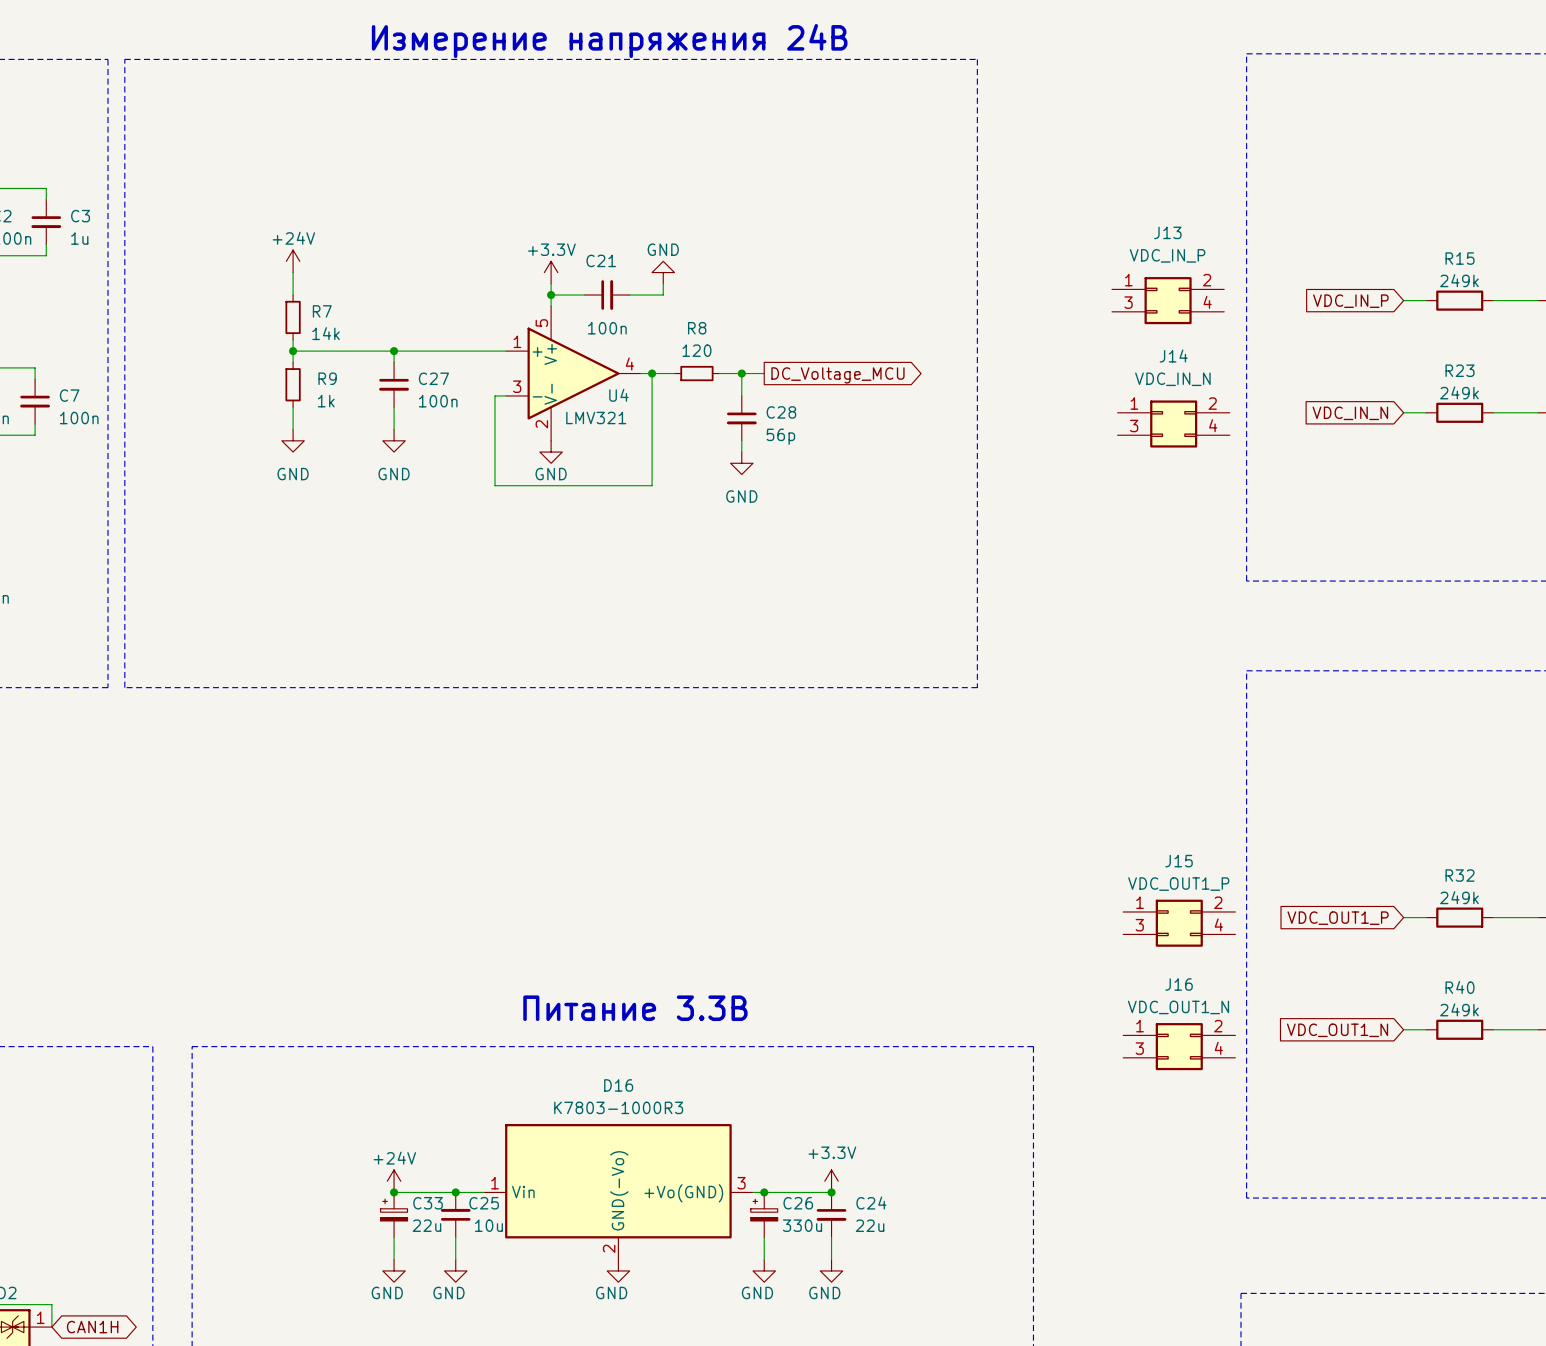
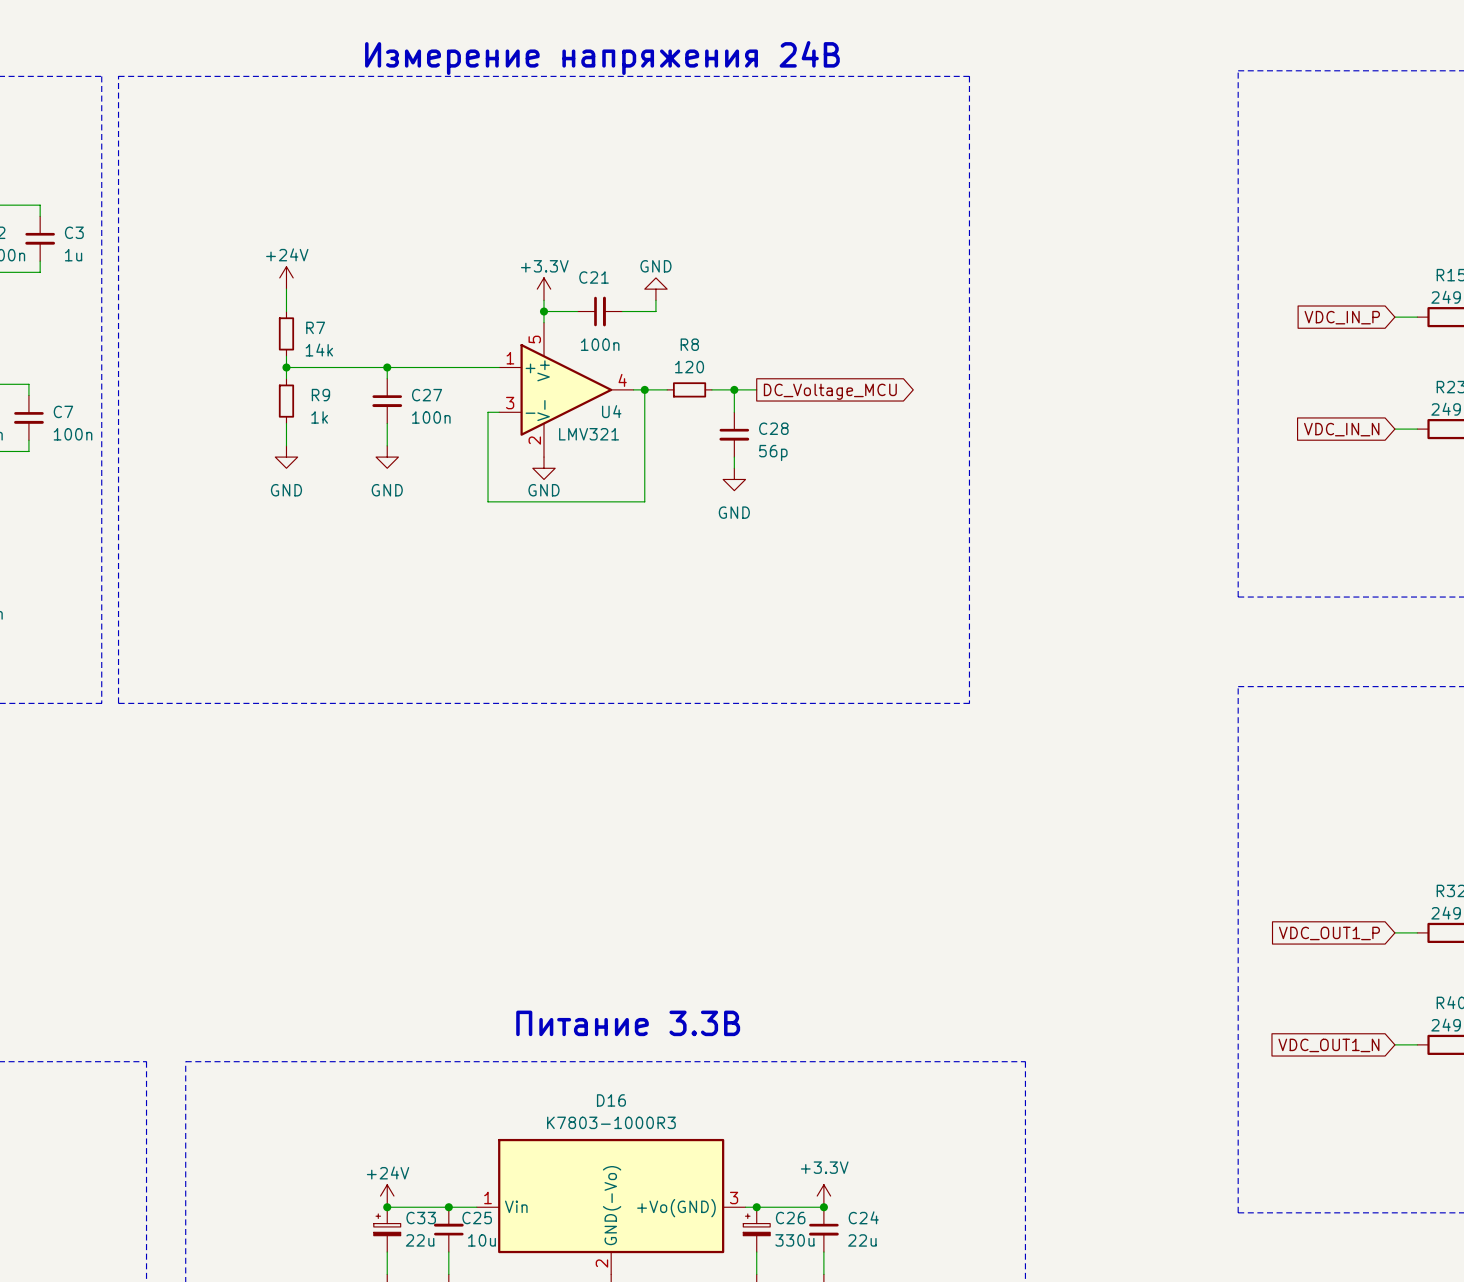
J13: VDC_IN_P (1168, 300) -> none
J14: VDC_IN_N (1173, 424) -> none
J15: VDC_OUT1_P (1179, 923) -> none
J16: VDC_OUT1_N (1179, 1046) -> none

